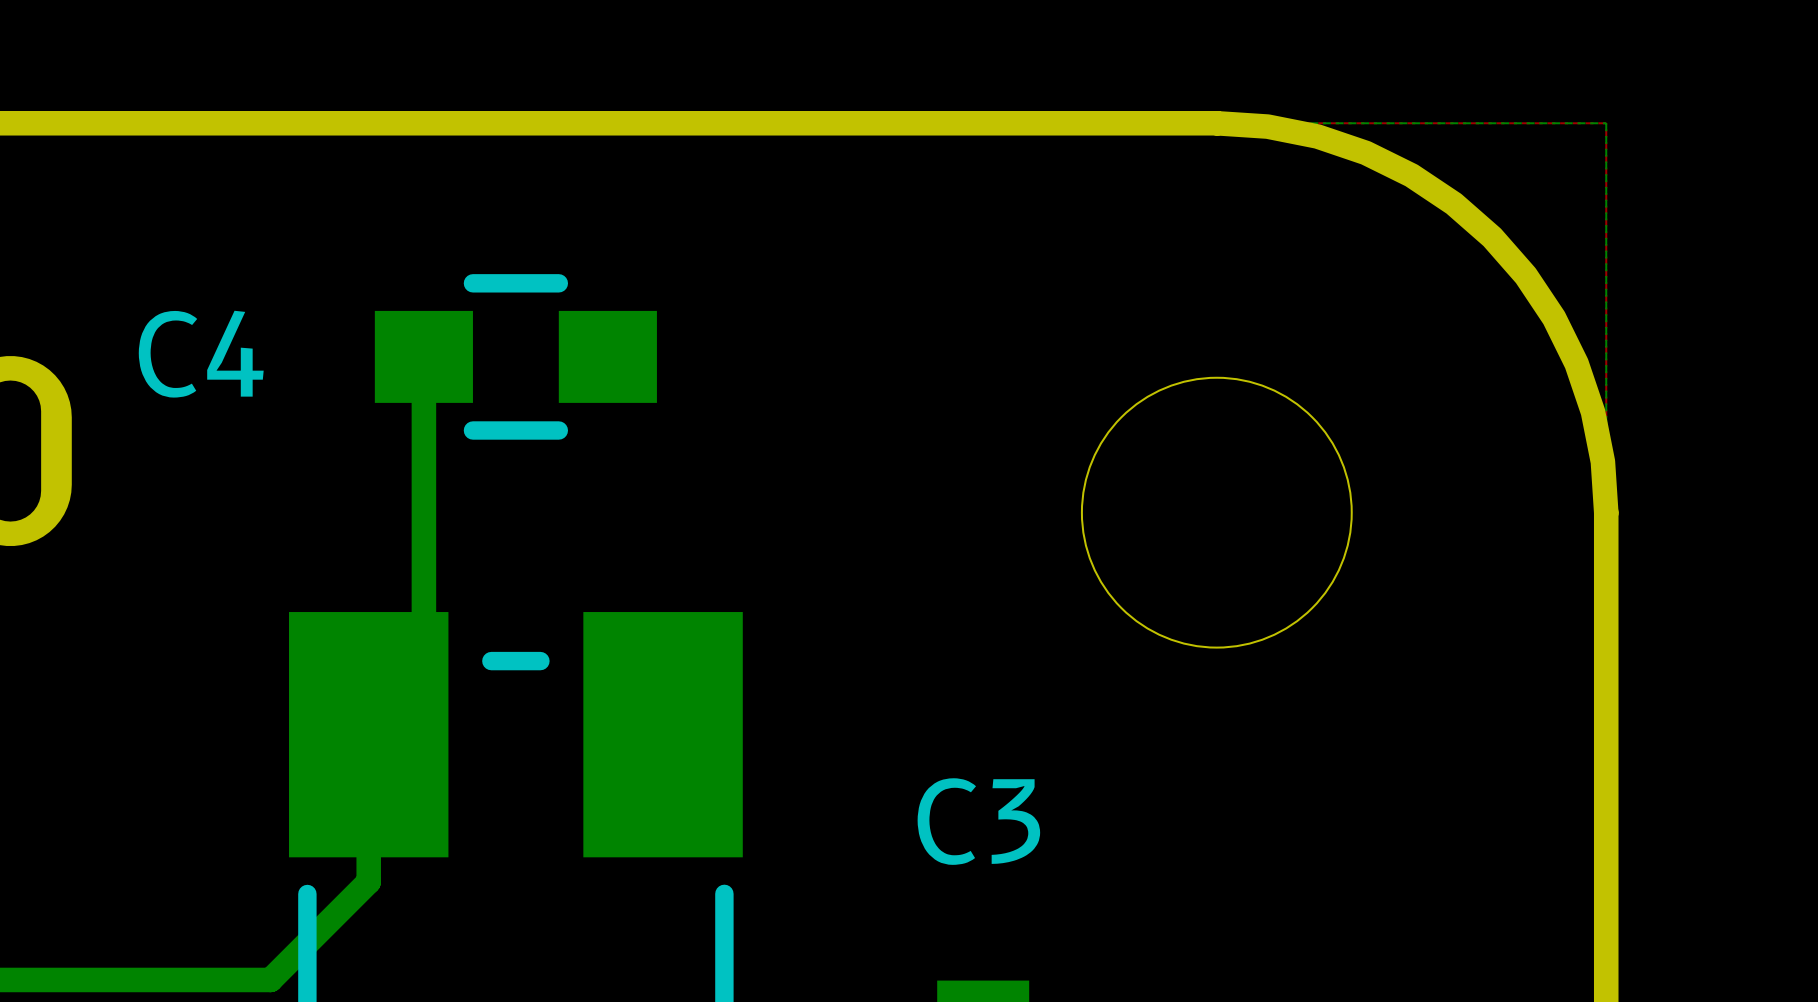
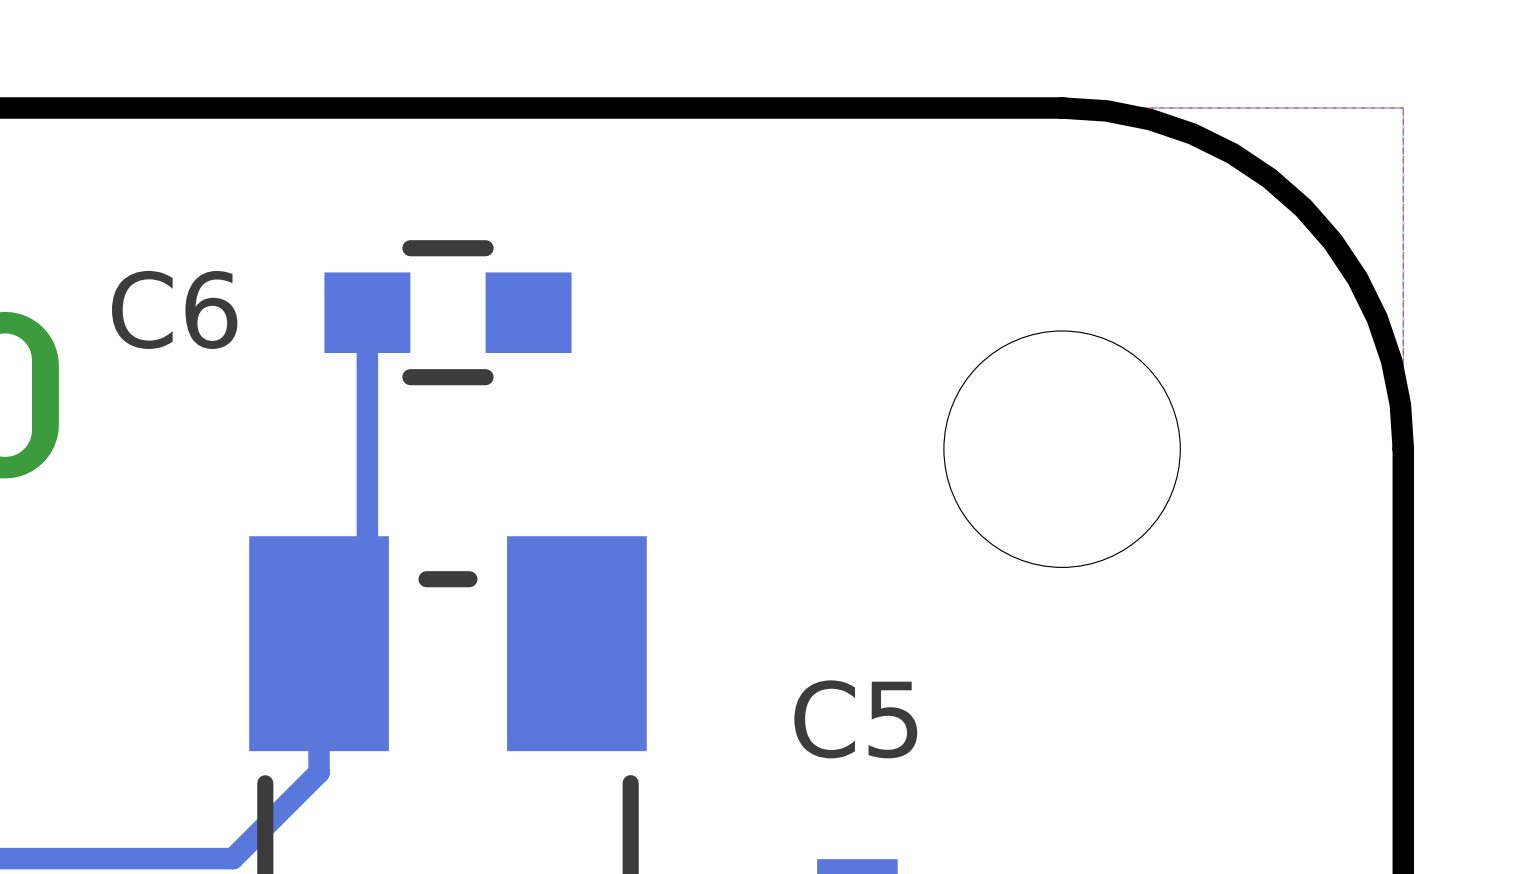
C4 name: C4 (201, 354) -> C6 (174, 309)
C3 name: C3 (978, 821) -> C5 (855, 719)

